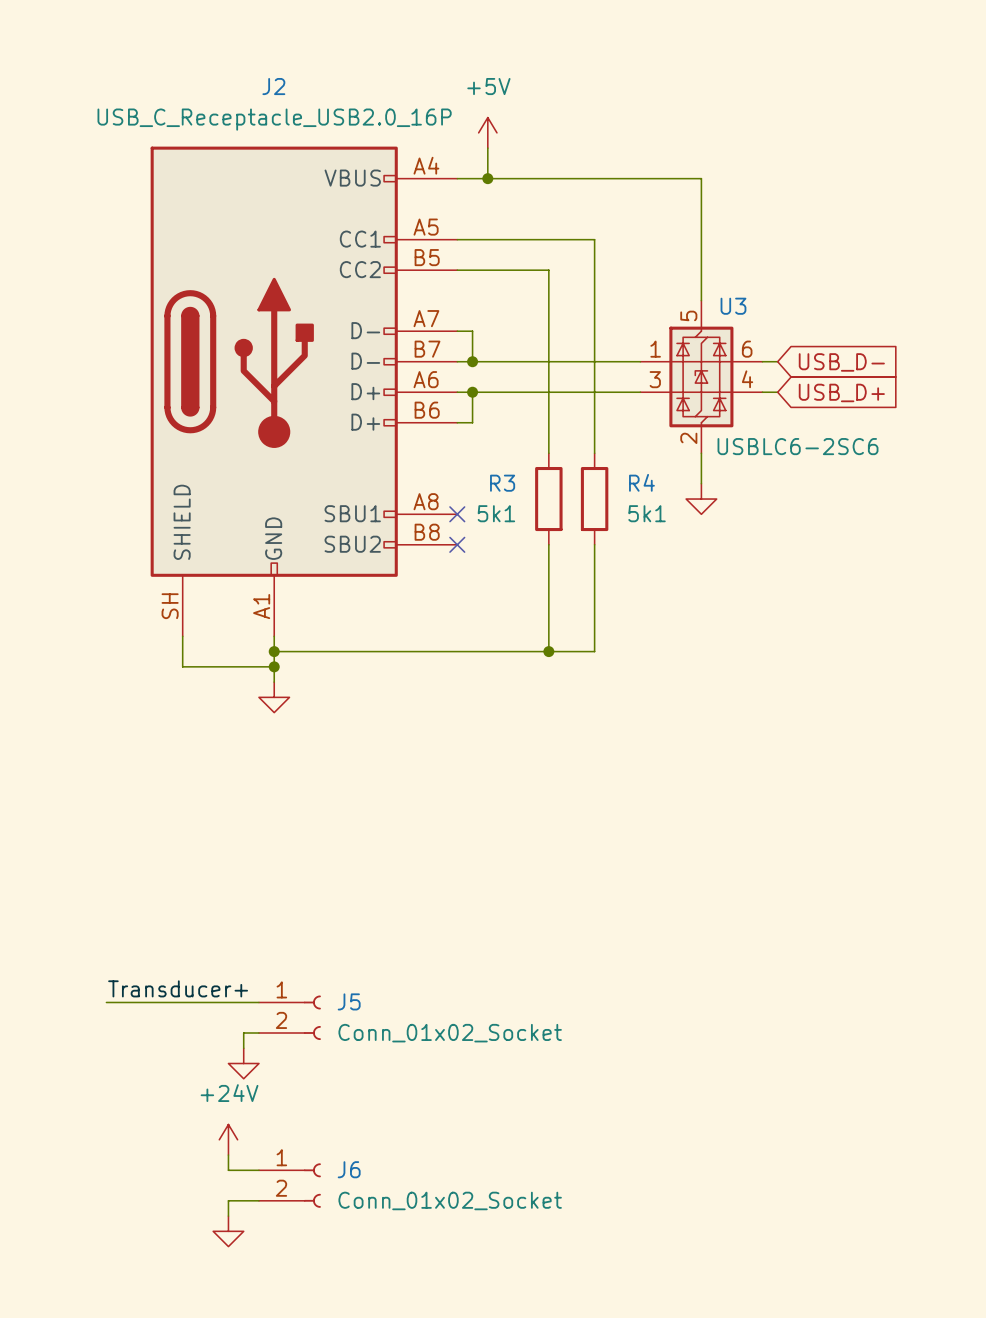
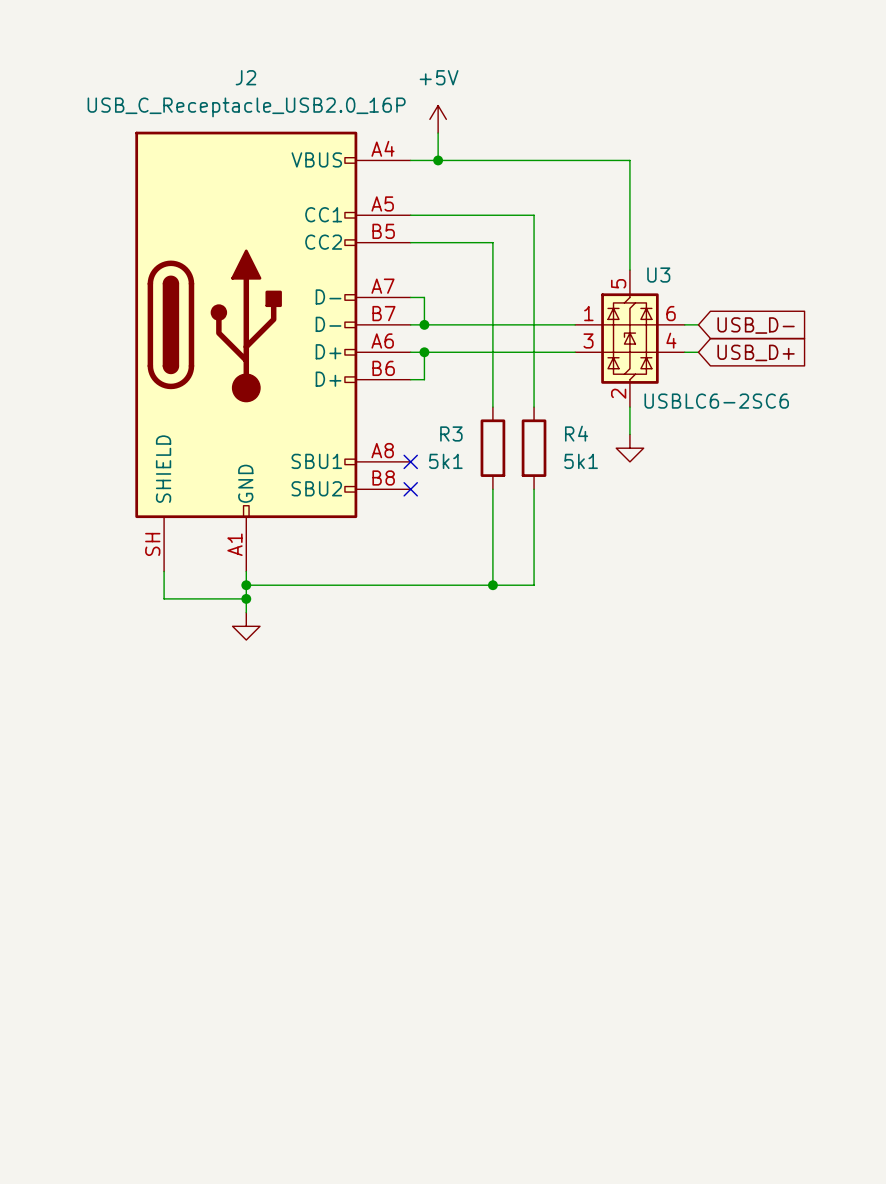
label: Transducer+ (178, 988) -> none
wire: (106, 1002) (258, 1002) -> none
J5: Conn_01x02_Socket (289, 1017) -> none
wire: (258, 1033) (243, 1033) (243, 1048) -> none
power symbol: (243, 1063) -> none
power symbol: +24V (228, 1139) -> none
wire: (228, 1155) (228, 1170) (258, 1170) -> none
J6: Conn_01x02_Socket (289, 1185) -> none
wire: (258, 1200) (228, 1200) (228, 1216) -> none
power symbol: (228, 1231) -> none

